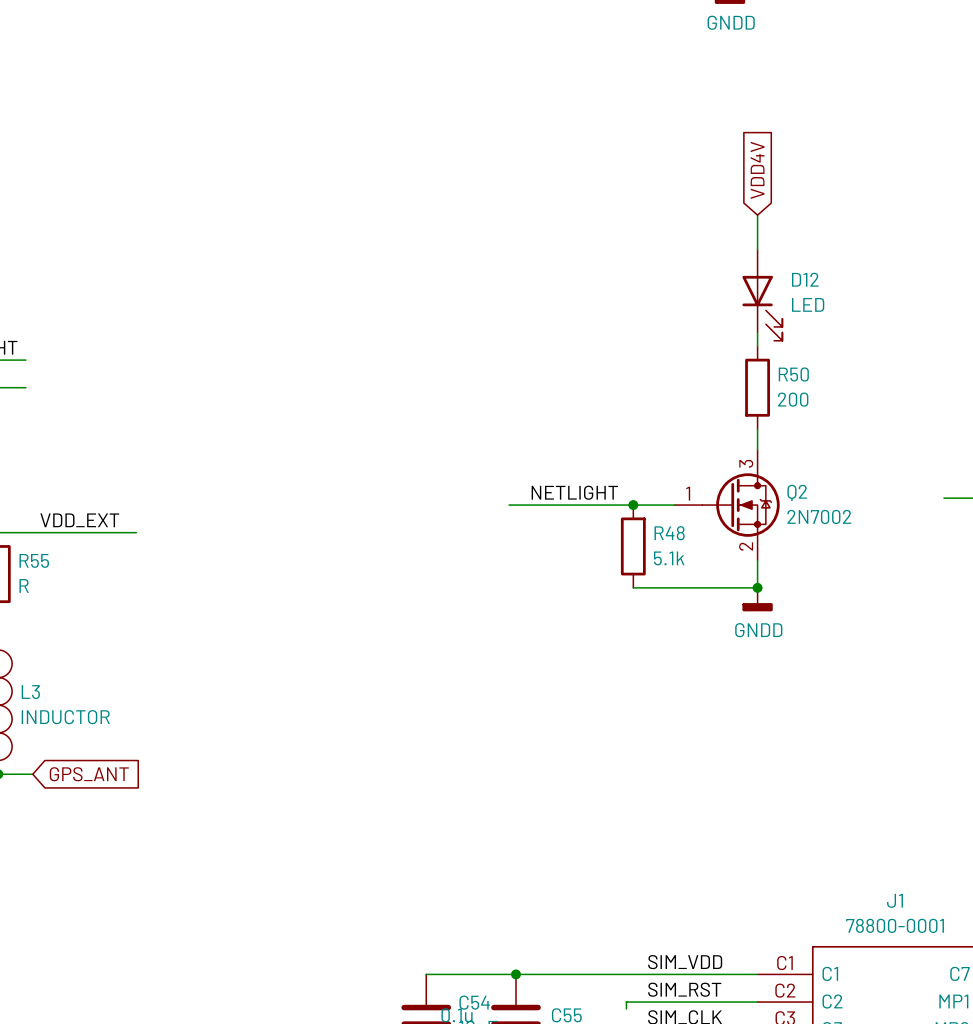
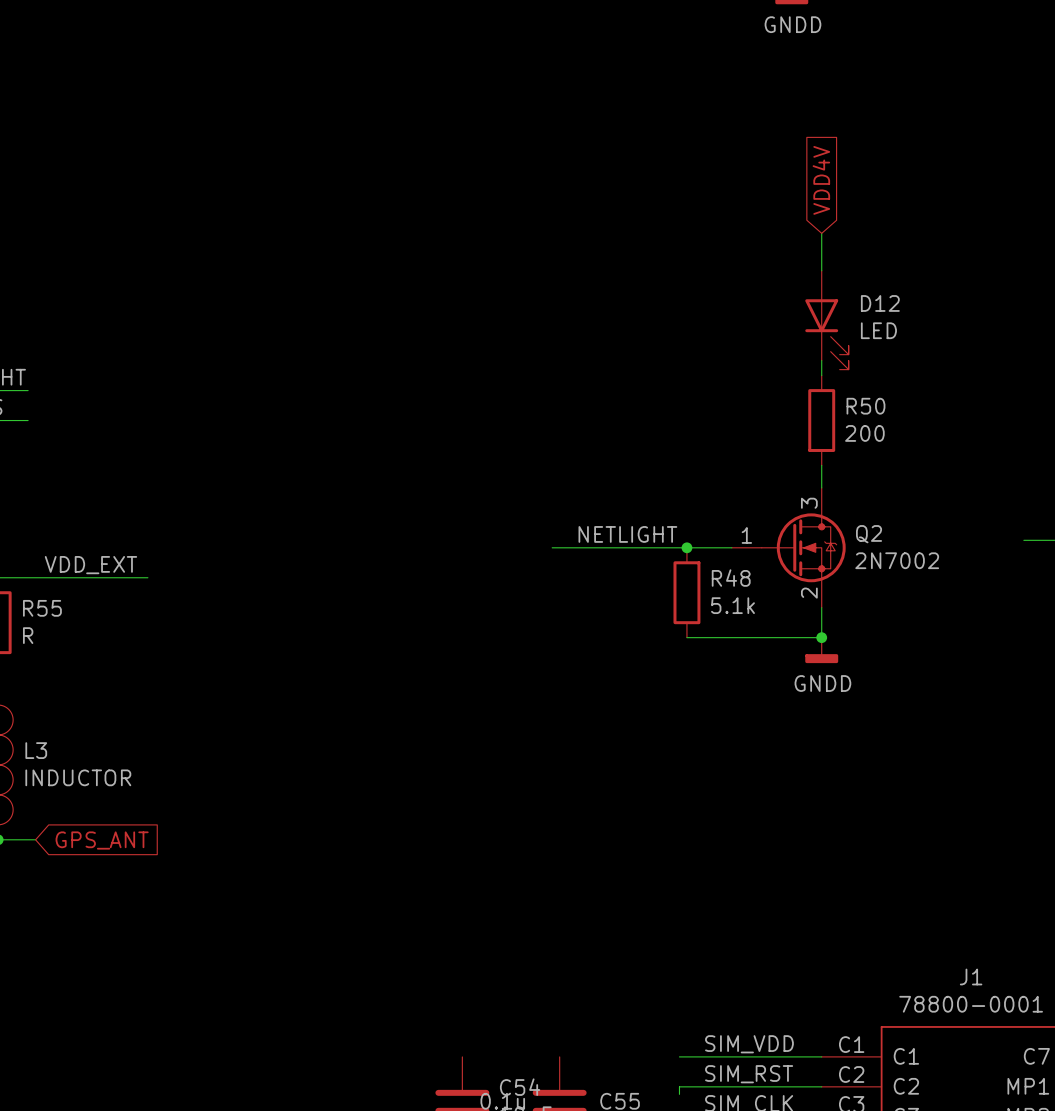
wire: (426, 974) (626, 974) -> none
junction: (515, 974) -> none

